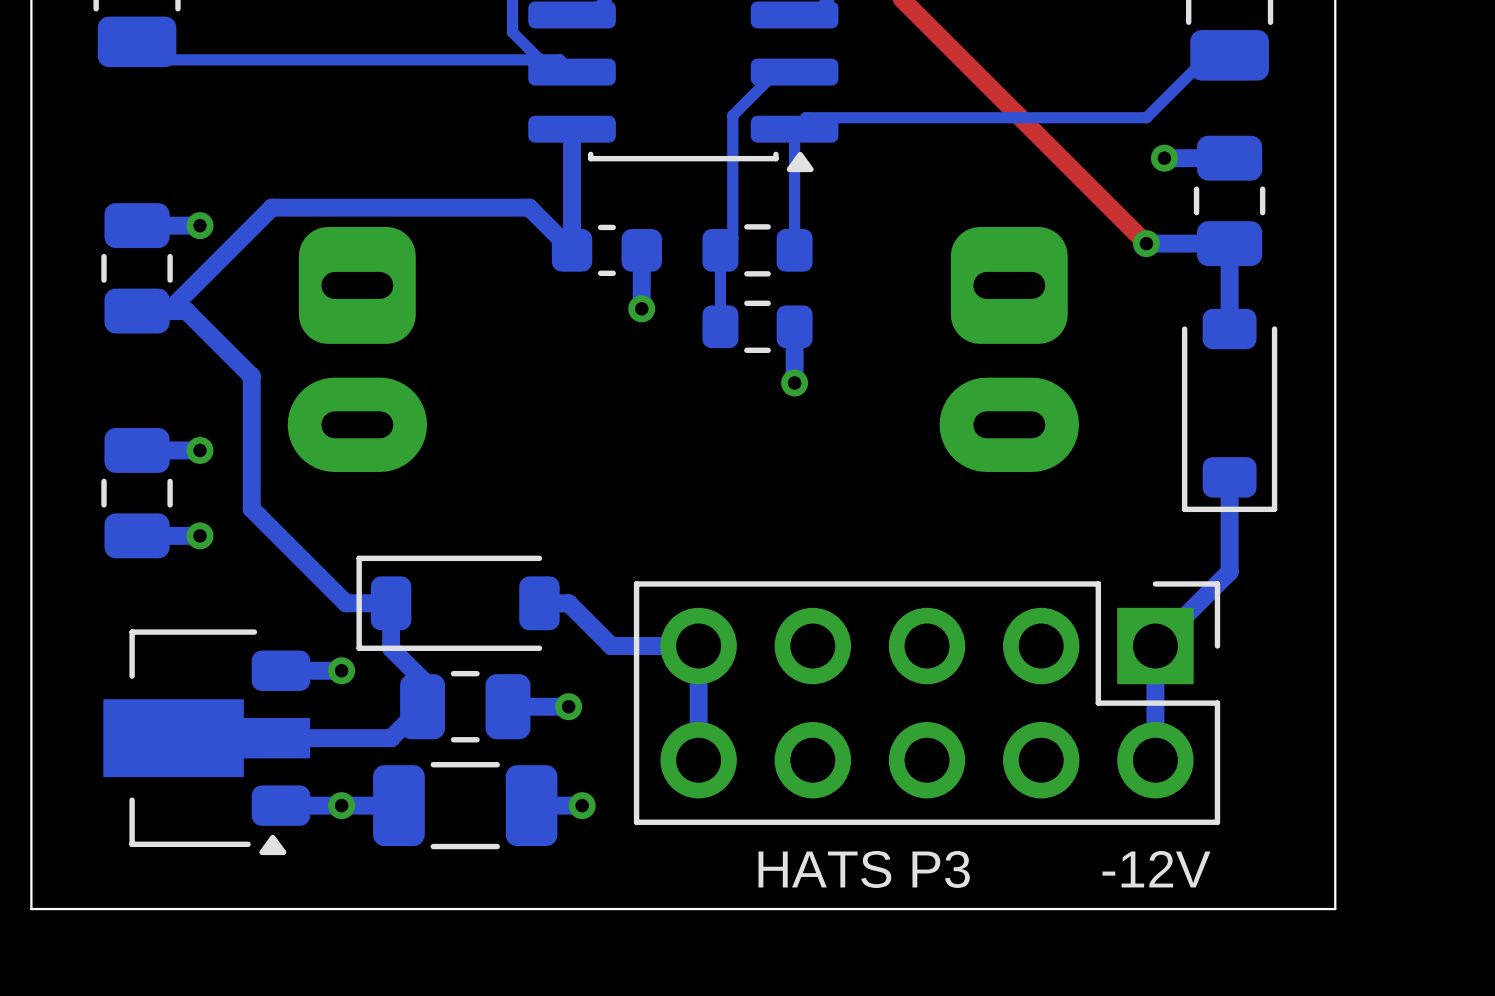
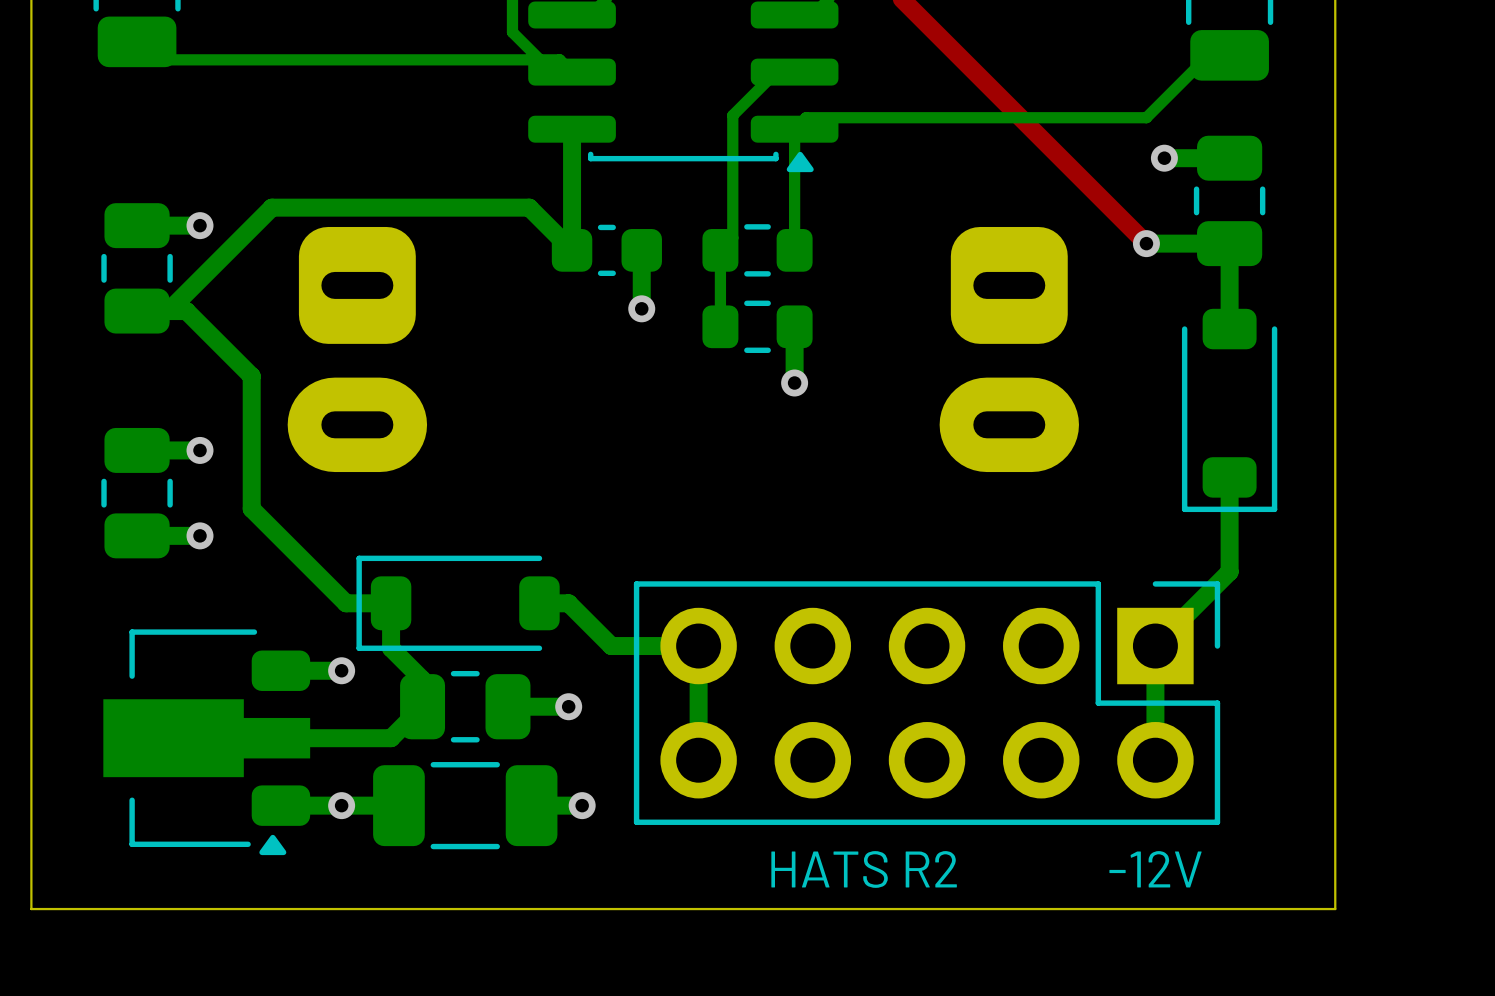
text: HATS P3 (864, 869) -> HATS R2 (864, 869)

